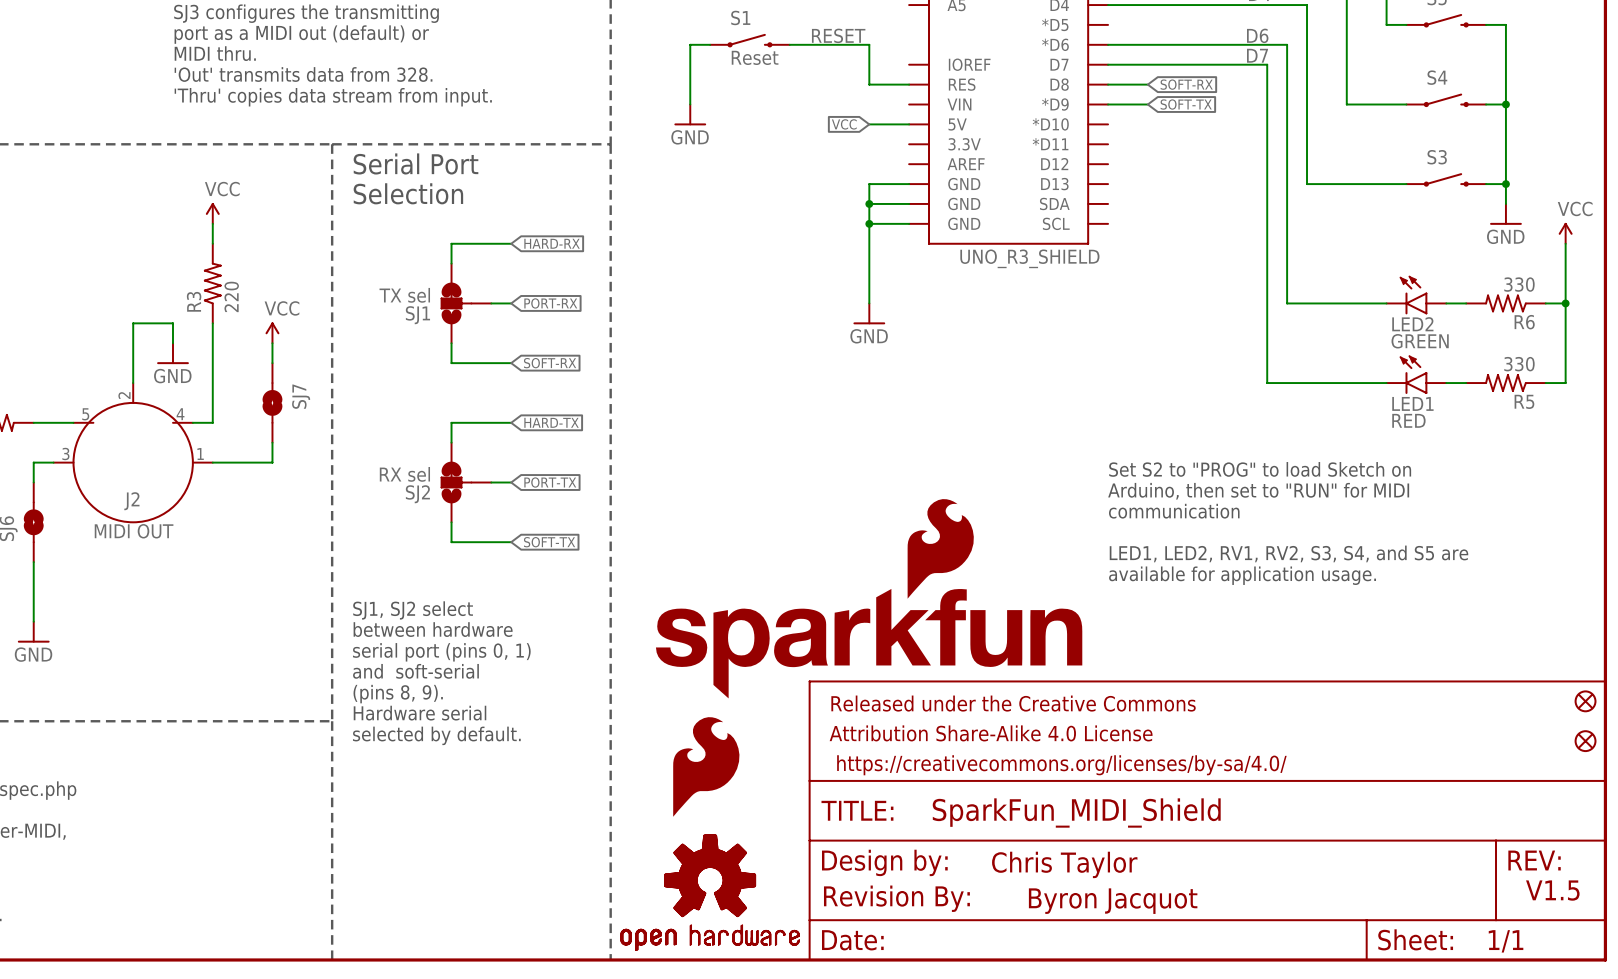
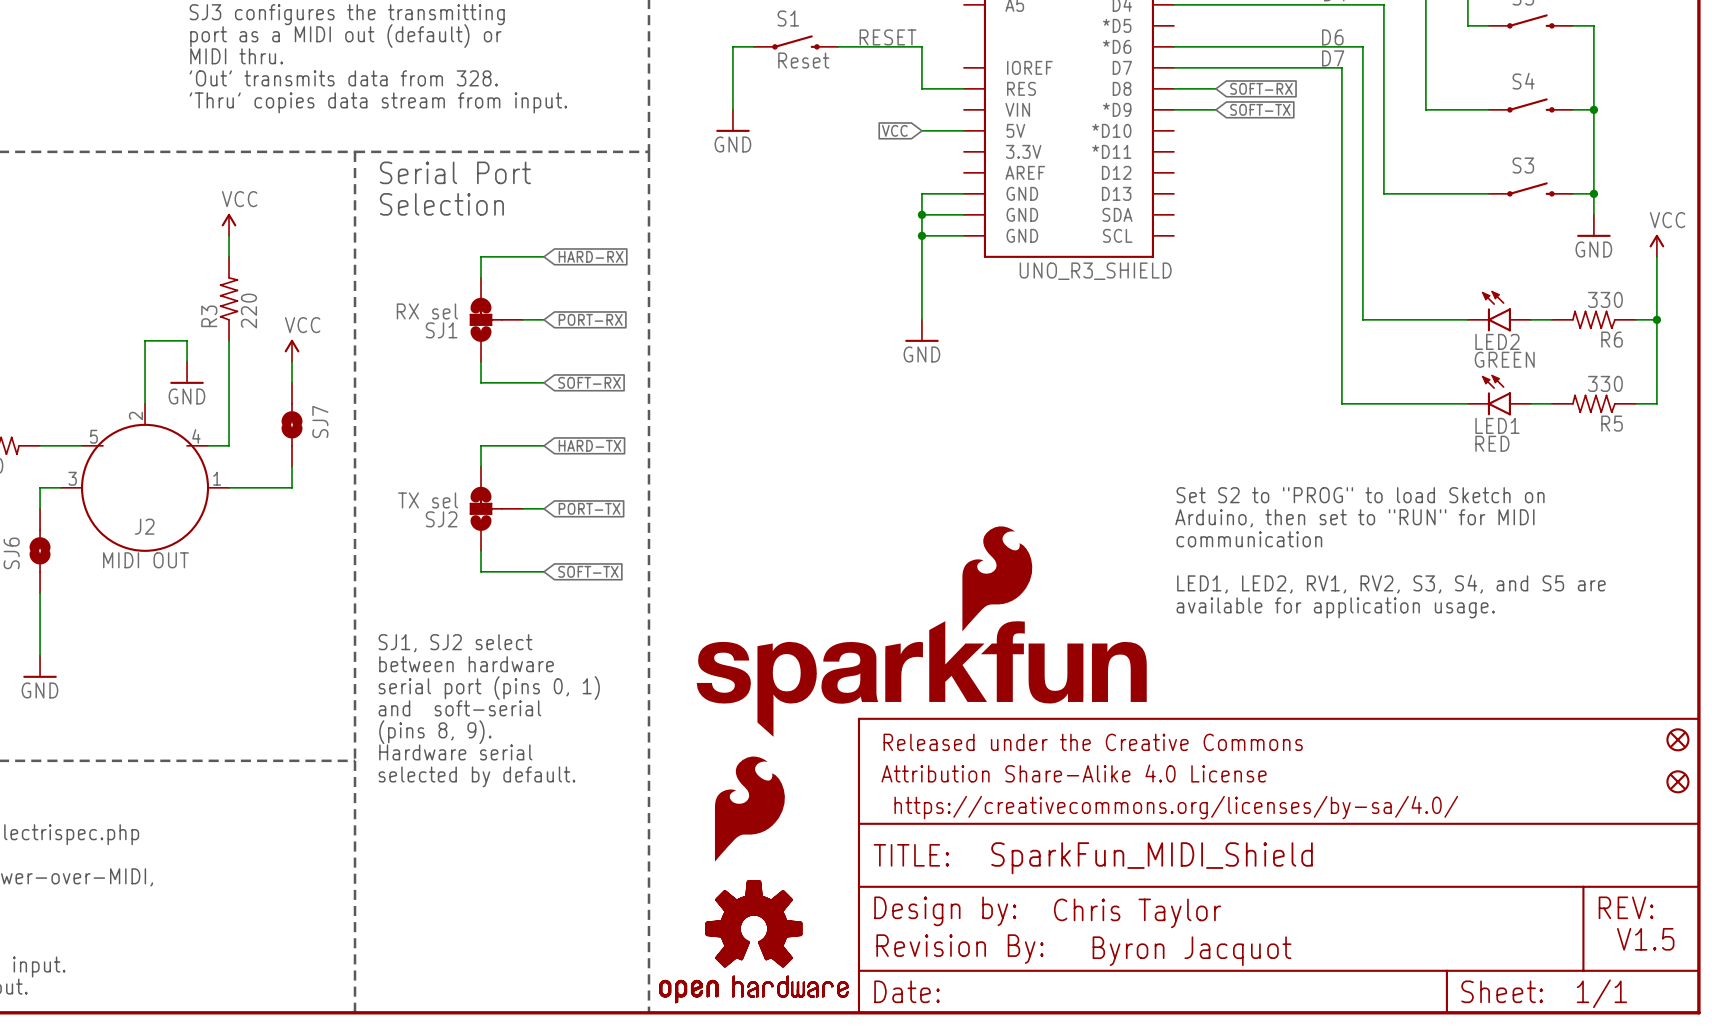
SJ1 value: TX sel (404, 295) -> RX sel (427, 311)
SJ2 value: RX sel (404, 474) -> TX sel (428, 500)

